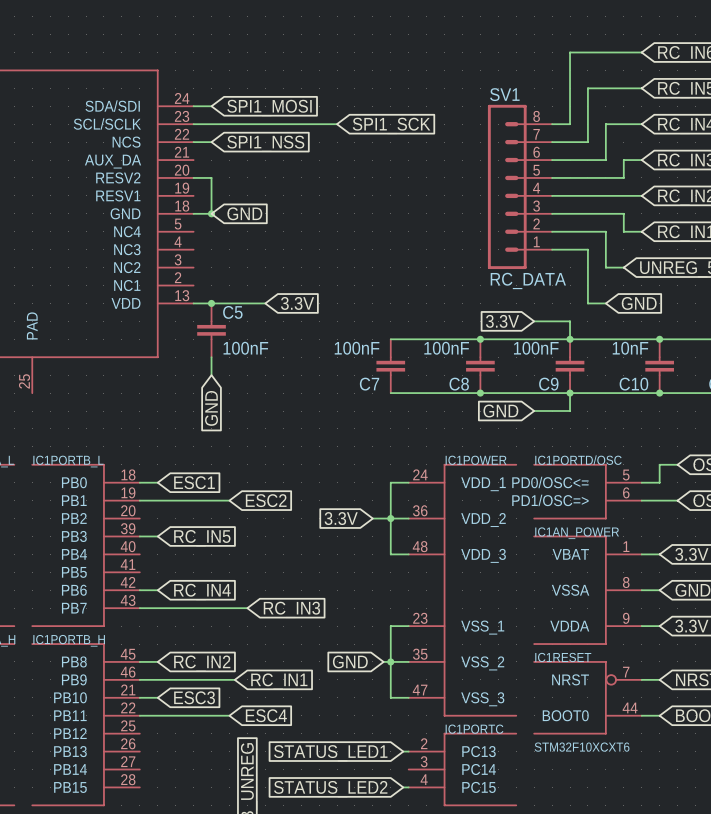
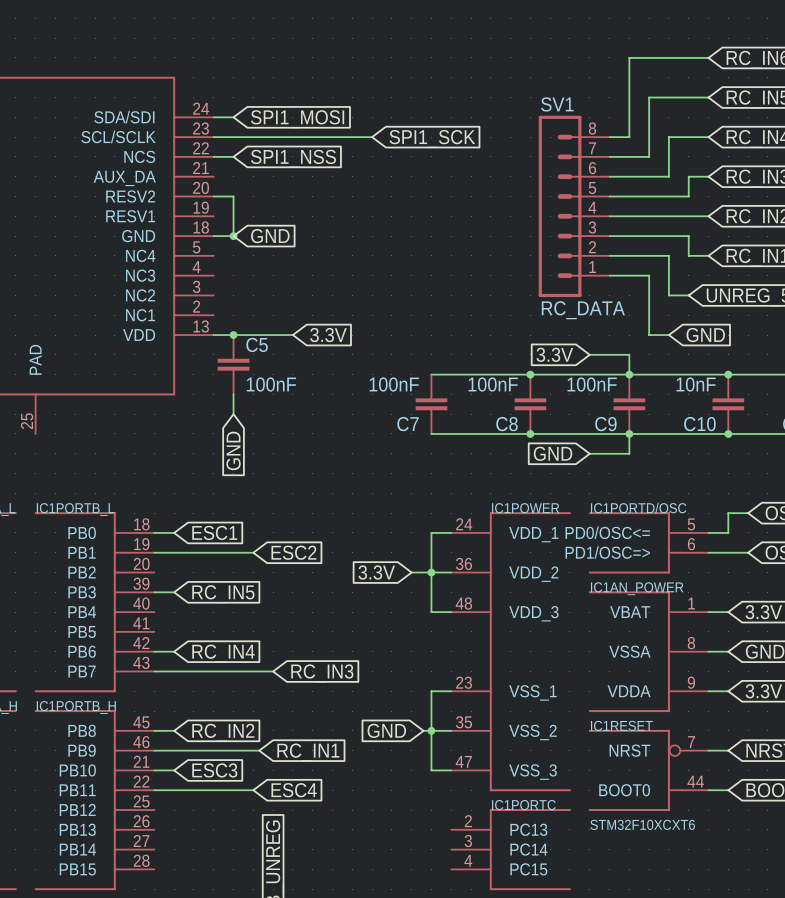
wire: (403, 751) (408, 751) -> none
global label: STATUS_LED1 (330, 753) -> none
wire: (403, 787) (408, 787) -> none
global label: STATUS_LED2 (330, 789) -> none

